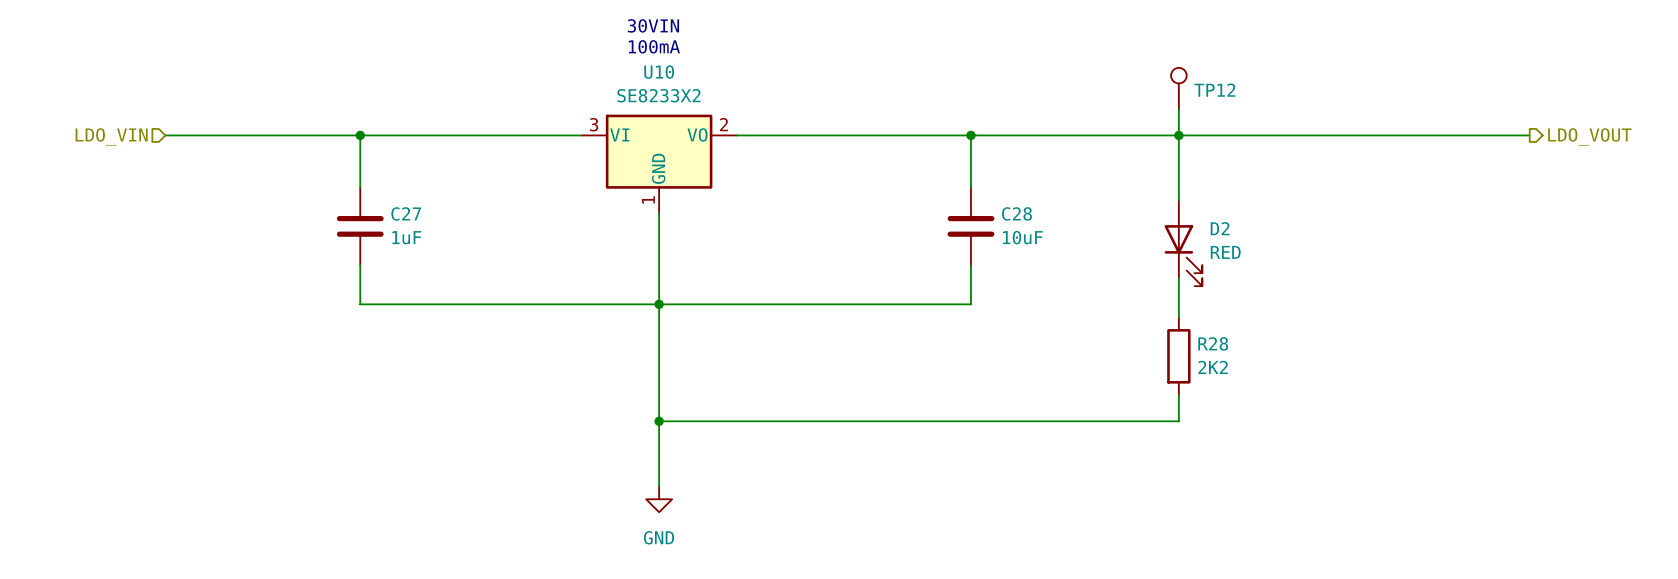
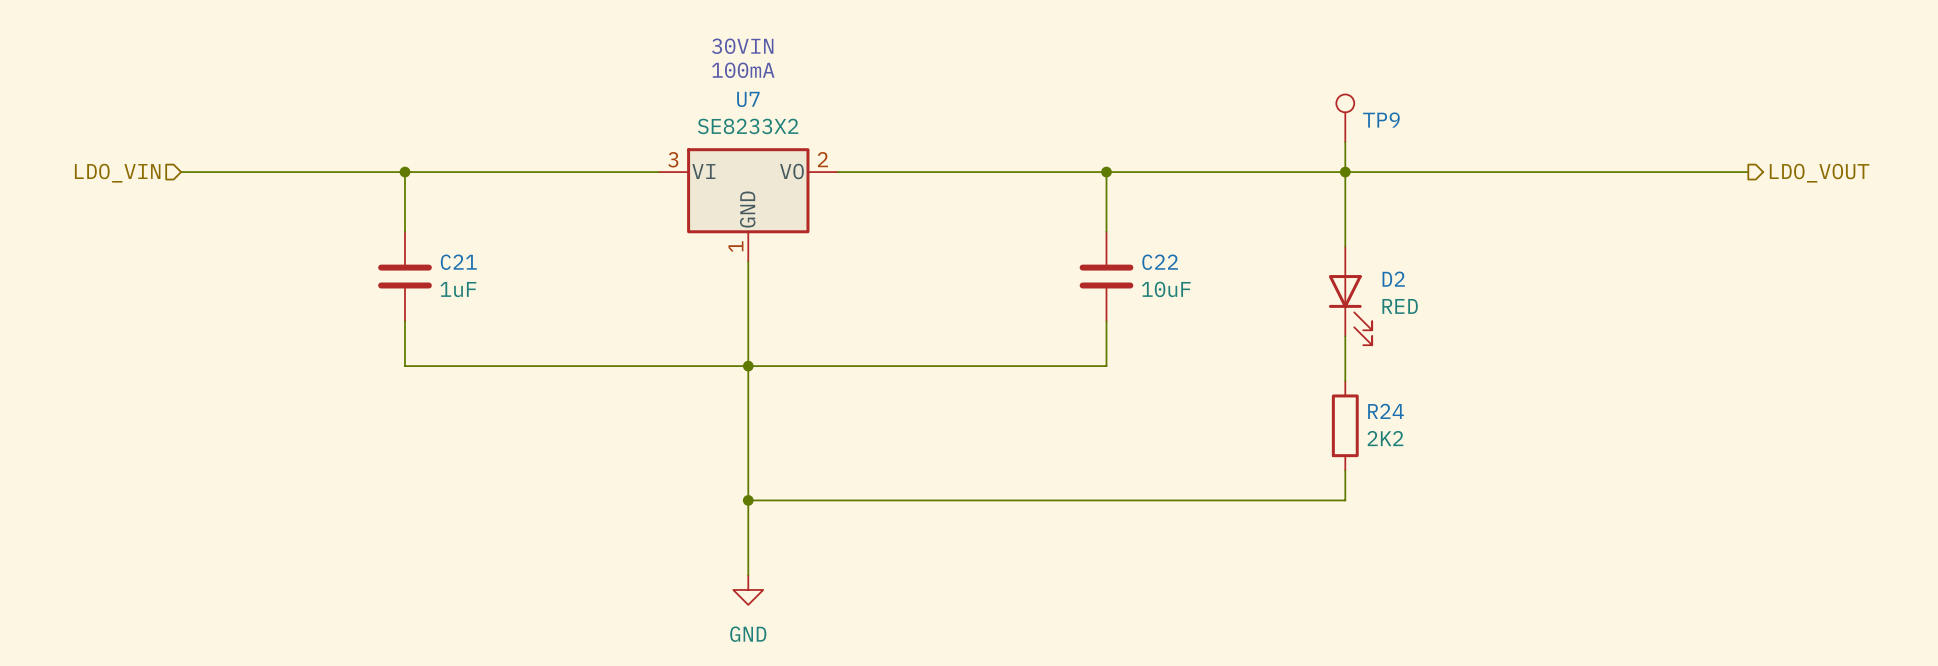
U10 name: U10 (659, 72) -> U7 (748, 99)
TP12 name: TP12 (1214, 90) -> TP9 (1381, 120)
C27 name: C27 (406, 213) -> C21 (458, 262)
C28 name: C28 (1016, 213) -> C22 (1160, 262)
R28 name: R28 (1213, 343) -> R24 (1386, 411)

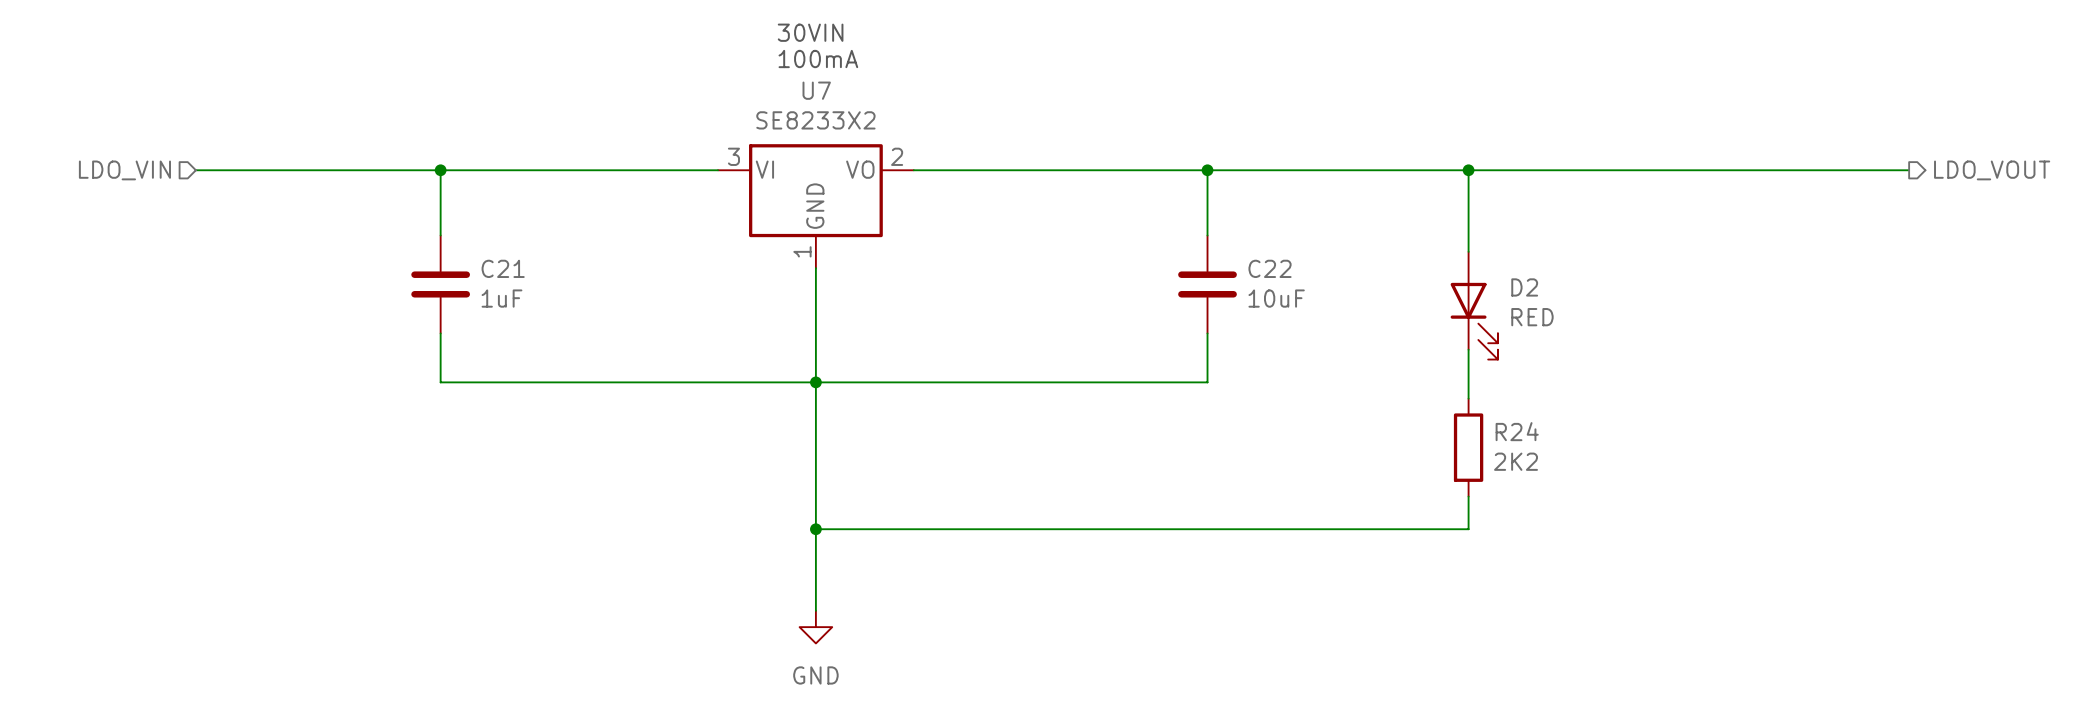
TP9: (1345, 118) -> none
wire: (1345, 142) (1345, 172) -> none

